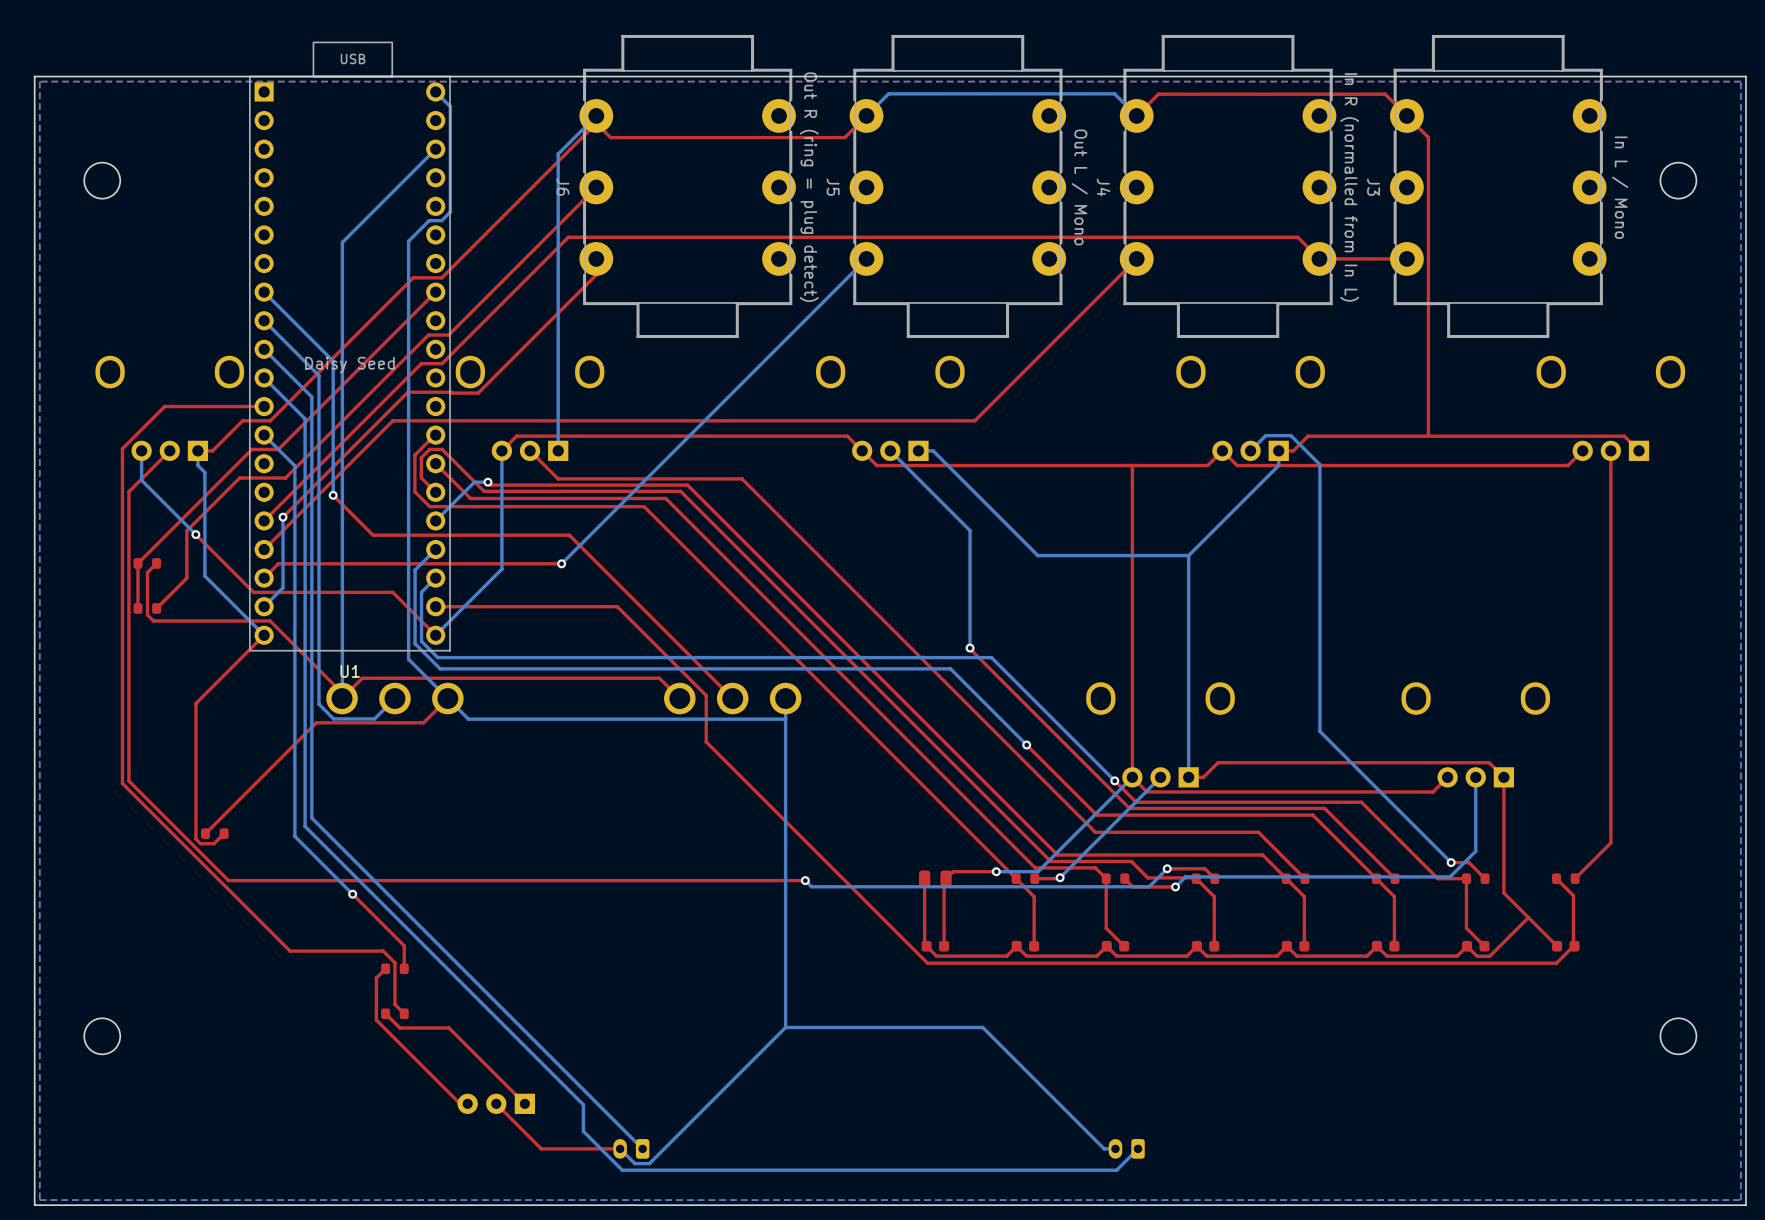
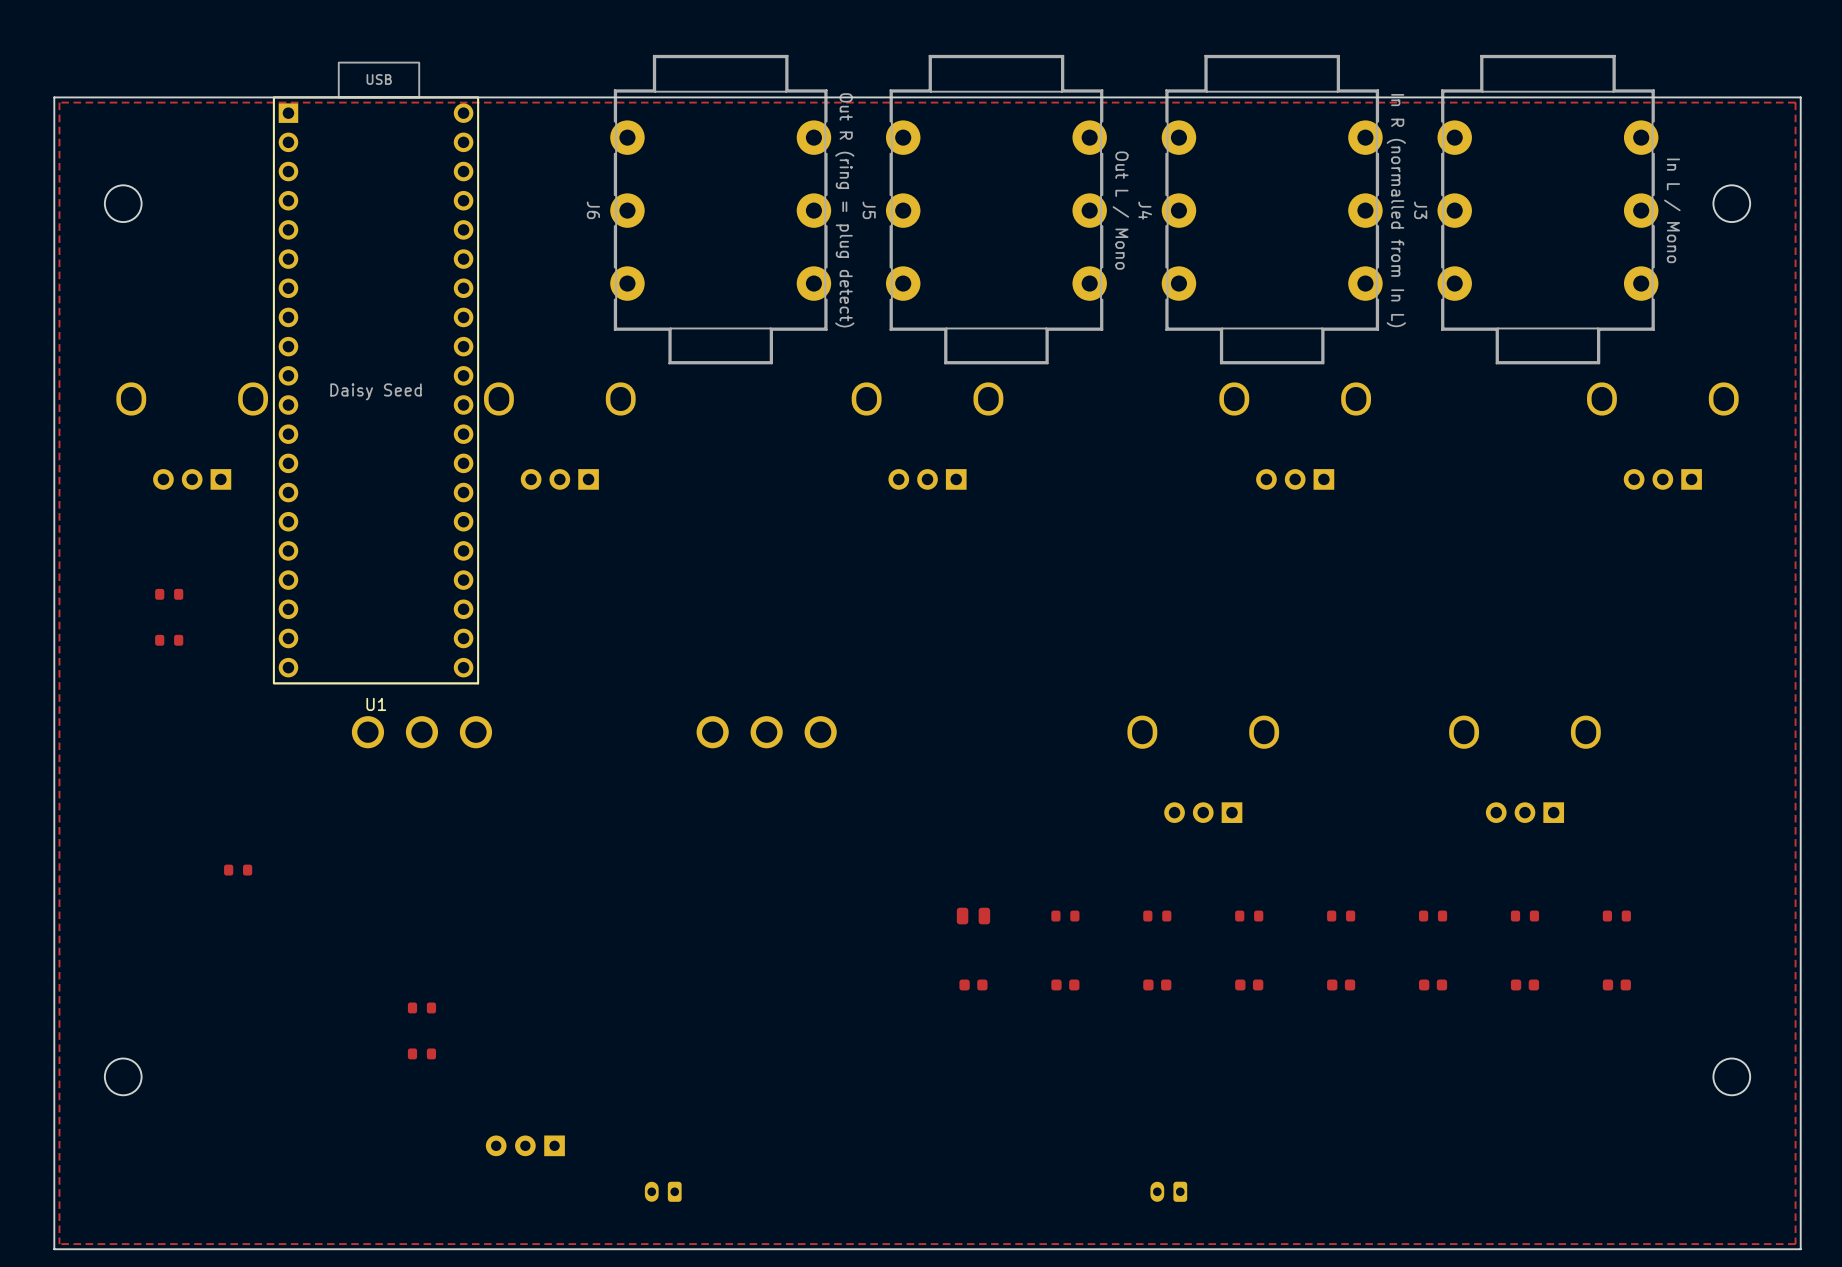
U1 footprint: [249, 41, 451, 652] -> [273, 62, 479, 685]
bottom zone outline: (1740, 81) (39, 81) (39, 1200) (1740, 1200) (1740, 81) -> none
bottom track: (435, 91) (450, 106) (450, 212) (441, 220) (429, 220) (408, 241) (408, 659) (468, 719) (785, 719) -> none
bottom track: (596, 115) (558, 154) (558, 450) -> none
top track: (866, 115) (844, 137) (610, 137) (596, 123) -> none
top track: (1136, 115) (1158, 94) (1385, 94) (1428, 137) (1428, 436) -> none
bottom track: (1136, 115) (1114, 93) (888, 93) (866, 115) -> none
top track: (596, 123) (441, 277) (413, 277) (270, 420) (242, 420) (212, 450) (197, 450) -> none
bottom track: (435, 149) (342, 242) (342, 698) -> none
top track: (596, 187) (448, 335) (428, 335) (285, 478) (239, 478) (186, 530) (186, 578) (156, 608) -> none
top track: (596, 258) (596, 274) (478, 393) (407, 392) (283, 517) -> none
bottom track: (866, 258) (561, 563) -> none
top track: (1136, 258) (974, 420) (392, 420) (264, 549) -> none
top track: (1406, 258) (1319, 258) (1297, 237) (568, 237) (442, 363) (421, 363) (264, 520) -> none
bottom track: (264, 292) (333, 361) (333, 495) -> none
top track: (435, 292) (278, 449) (252, 449) (137, 563) (137, 608) -> none
bottom track: (264, 320) (318, 375) (318, 704) (333, 718) (374, 718) (394, 698) -> none
bottom track: (264, 349) (311, 397) (311, 818) (642, 1148) -> none
bottom track: (264, 377) (305, 418) (305, 826) (583, 1104) (583, 1131) (622, 1170) (1116, 1170) (1138, 1148) -> none
top track: (264, 406) (164, 406) (122, 448) (122, 783) (290, 951) (383, 951) (394, 962) (394, 1004) (404, 1013) -> none
bottom track: (264, 435) (294, 465) (294, 836) (352, 894) -> none
top track: (435, 435) (414, 455) (414, 491) (429, 506) (644, 506) (1034, 896) (1034, 946) -> none
bottom track: (141, 450) (141, 480) (195, 534) -> none
top track: (169, 450) (128, 491) (128, 781) (228, 880) (805, 880) -> none
bottom track: (197, 450) (197, 465) (204, 472) (204, 576) (264, 635) -> none
bottom track: (501, 450) (501, 569) (435, 635) -> none
top track: (530, 450) (558, 478) (741, 478) (1095, 832) (1258, 832) (1304, 878) -> none
bottom track: (890, 450) (970, 530) (970, 648) -> none
bottom track: (918, 450) (933, 450) (1037, 555) (1188, 555) -> none
bottom track: (1250, 450) (1265, 435) (1290, 435) (1319, 464) (1319, 731) (1451, 862) -> none
bottom track: (1278, 450) (1278, 465) (1188, 555) -> none
top track: (1582, 450) (1568, 465) (1237, 465) (1222, 450) (1207, 465) (876, 465) (847, 436) (516, 436) (501, 450) -> none
top track: (1610, 450) (1610, 842) (1575, 878) -> none
top track: (1639, 450) (1624, 436) (1308, 436) (1293, 450) (1278, 450) -> none
top track: (435, 463) (470, 498) (665, 498) (1035, 867) (1095, 867) (1106, 878) (1106, 928) (1124, 946) -> none
top track: (1132, 465) (1132, 777) (1147, 792) (1432, 792) (1447, 777) -> none
top track: (487, 482) (490, 485) (687, 485) (1057, 855) (1262, 855) (1304, 896) (1304, 946) -> none
bottom track: (487, 482) (474, 482) (435, 520) -> none
via: (487, 482) -> none
top track: (435, 492) (421, 477) (421, 457) (429, 449) (442, 449) (484, 491) (680, 491) (1050, 861) (1131, 861) (1147, 877) (1195, 877) (1214, 896) (1214, 946) -> none
top track: (333, 495) (373, 535) (569, 535) (732, 698) -> none
via: (333, 495) -> none
bottom track: (283, 517) (283, 587) (264, 606) -> none
via: (283, 517) -> none
top track: (195, 534) (253, 592) (392, 592) (435, 635) -> none
via: (195, 534) -> none
bottom track: (435, 549) (415, 570) (415, 643) (440, 668) (950, 668) (1026, 745) -> none
bottom track: (1188, 555) (1188, 777) -> none
top track: (156, 563) (147, 572) (147, 614) (153, 620) (270, 620) (344, 695) -> none
top track: (561, 563) (278, 563) (264, 578) -> none
via: (561, 563) -> none
bottom track: (435, 578) (421, 592) (421, 641) (437, 657) (991, 657) (1114, 780) -> none
top track: (435, 606) (617, 606) (706, 695) (706, 741) (927, 963) (1556, 963) (1573, 946) -> none
top track: (264, 635) (195, 703) (195, 839) (200, 843) (214, 843) (224, 833) -> none
top track: (970, 648) (1129, 808) (1324, 808) (1394, 878) -> none
via: (970, 648) -> none
top track: (344, 695) (362, 678) (659, 678) (679, 698) -> none
top track: (447, 698) (423, 722) (316, 722) (205, 833) -> none
bottom track: (785, 698) (785, 1027) -> none
top track: (1026, 745) (1096, 815) (1312, 815) (1394, 896) (1394, 946) -> none
via: (1026, 745) -> none
bottom track: (1132, 777) (1038, 871) (996, 871) -> none
bottom track: (1160, 777) (1060, 877) -> none
top track: (1188, 777) (1203, 777) (1217, 762) (1489, 762) (1503, 777) (1503, 893) (1557, 946) -> none
bottom track: (1475, 777) (1475, 851) (1450, 876) (1185, 876) (1175, 886) -> none
top track: (1114, 780) (1136, 802) (1361, 802) (1437, 878) (1466, 878) (1466, 928) (1484, 946) -> none
via: (1114, 780) -> none
top track: (1451, 862) (1468, 862) (1485, 878) -> none
via: (1451, 862) -> none
top track: (1167, 868) (1204, 868) (1214, 878) -> none
bottom track: (1167, 868) (1149, 886) (811, 886) (805, 880) -> none
via: (1167, 868) -> none
top track: (996, 871) (953, 871) (944, 880) (944, 946) -> none
via: (996, 871) -> none
top track: (1060, 877) (1034, 878) -> none
via: (1060, 877) -> none
top track: (924, 878) (924, 944) (936, 956) (1006, 956) (1016, 946) (1026, 956) (1096, 956) (1106, 946) (1116, 956) (1186, 956) (1196, 946) (1206, 956) (1277, 956) (1286, 946) (1296, 956) (1367, 956) (1376, 946) (1386, 956) (1457, 956) (1467, 946) (1477, 956) (1489, 956) (1528, 917) -> none
top track: (1124, 878) (1133, 886) (1175, 886) -> none
top track: (1556, 878) (1573, 895) (1573, 946) -> none
via: (805, 880) -> none
via: (1175, 886) -> none
top track: (352, 894) (404, 945) (404, 968) -> none
via: (352, 894) -> none
top track: (385, 968) (376, 978) (376, 1020) (460, 1103) (467, 1103) -> none
top track: (385, 1013) (399, 1028) (449, 1028) (524, 1103) -> none
bottom track: (785, 1027) (982, 1027) (1104, 1148) (1115, 1148) -> none
bottom track: (785, 1027) (649, 1163) (634, 1163) (620, 1148) -> none
top track: (496, 1103) (541, 1148) (620, 1148) -> none

